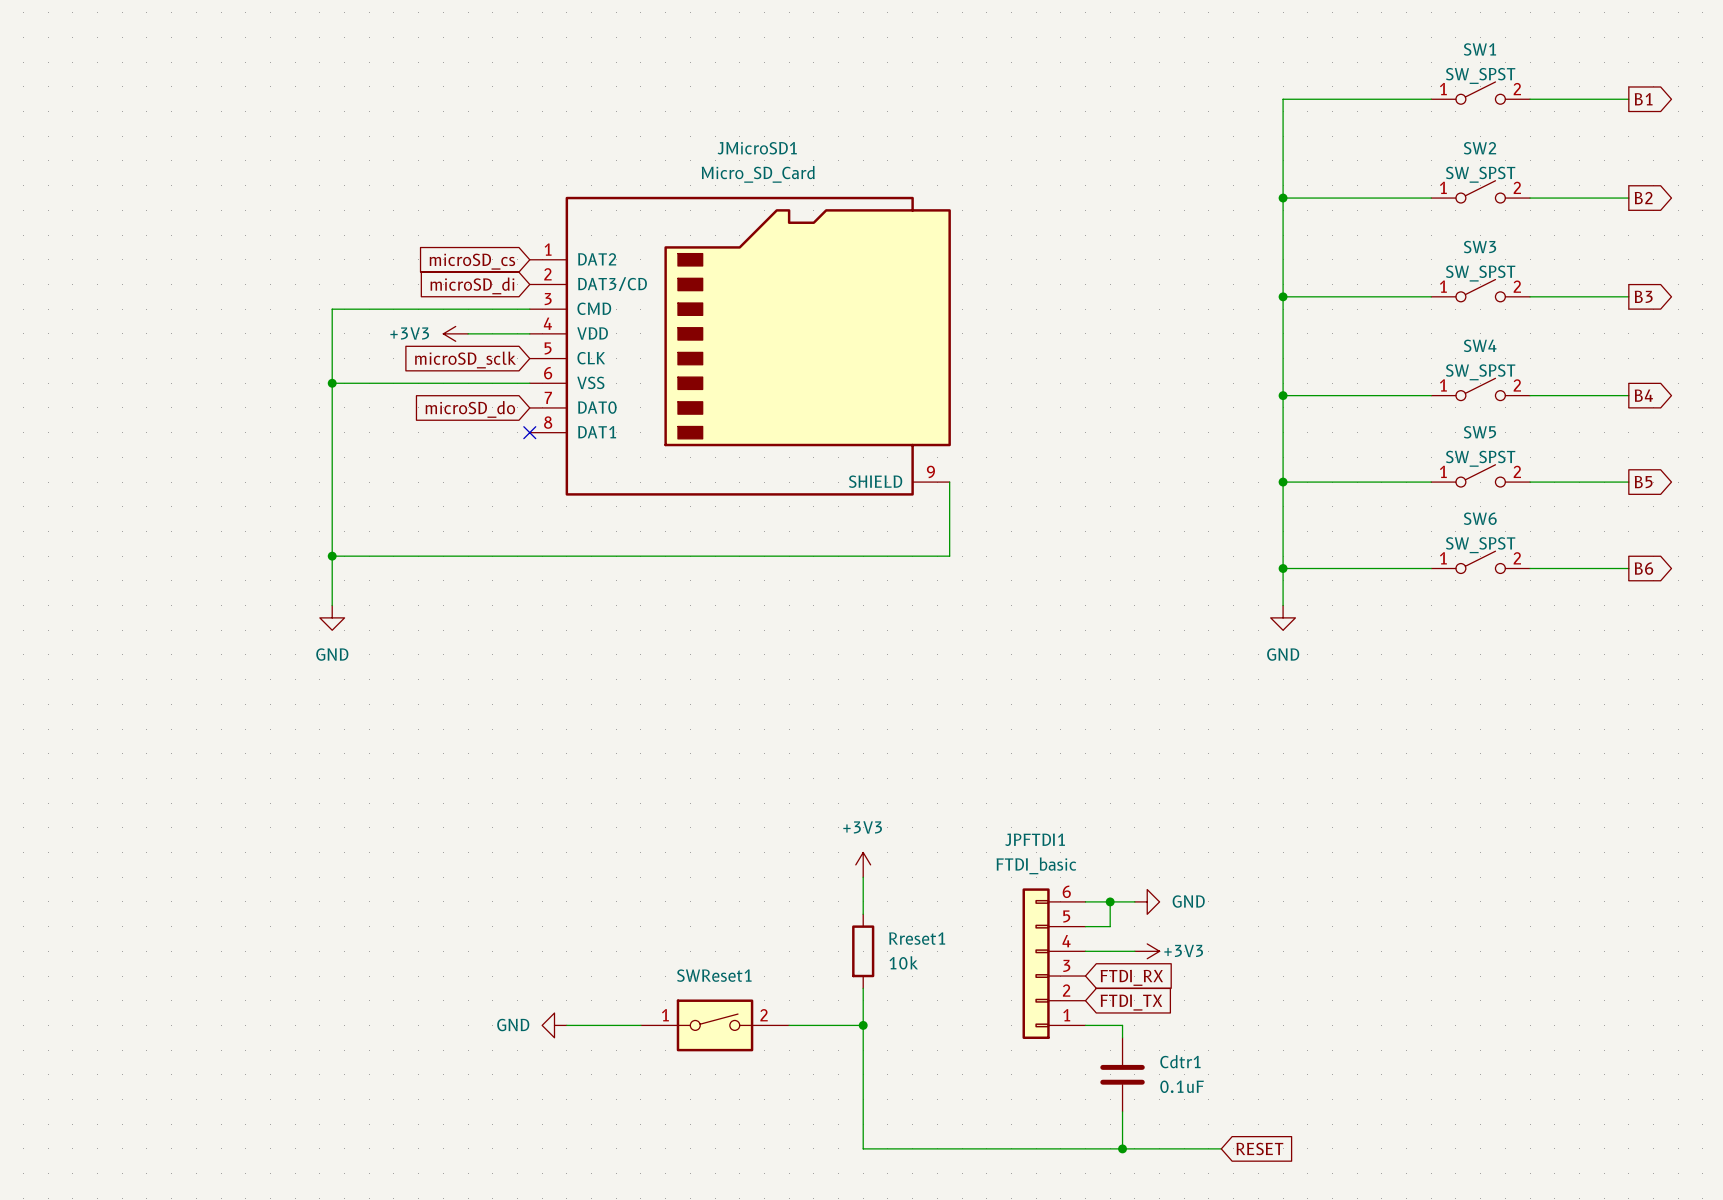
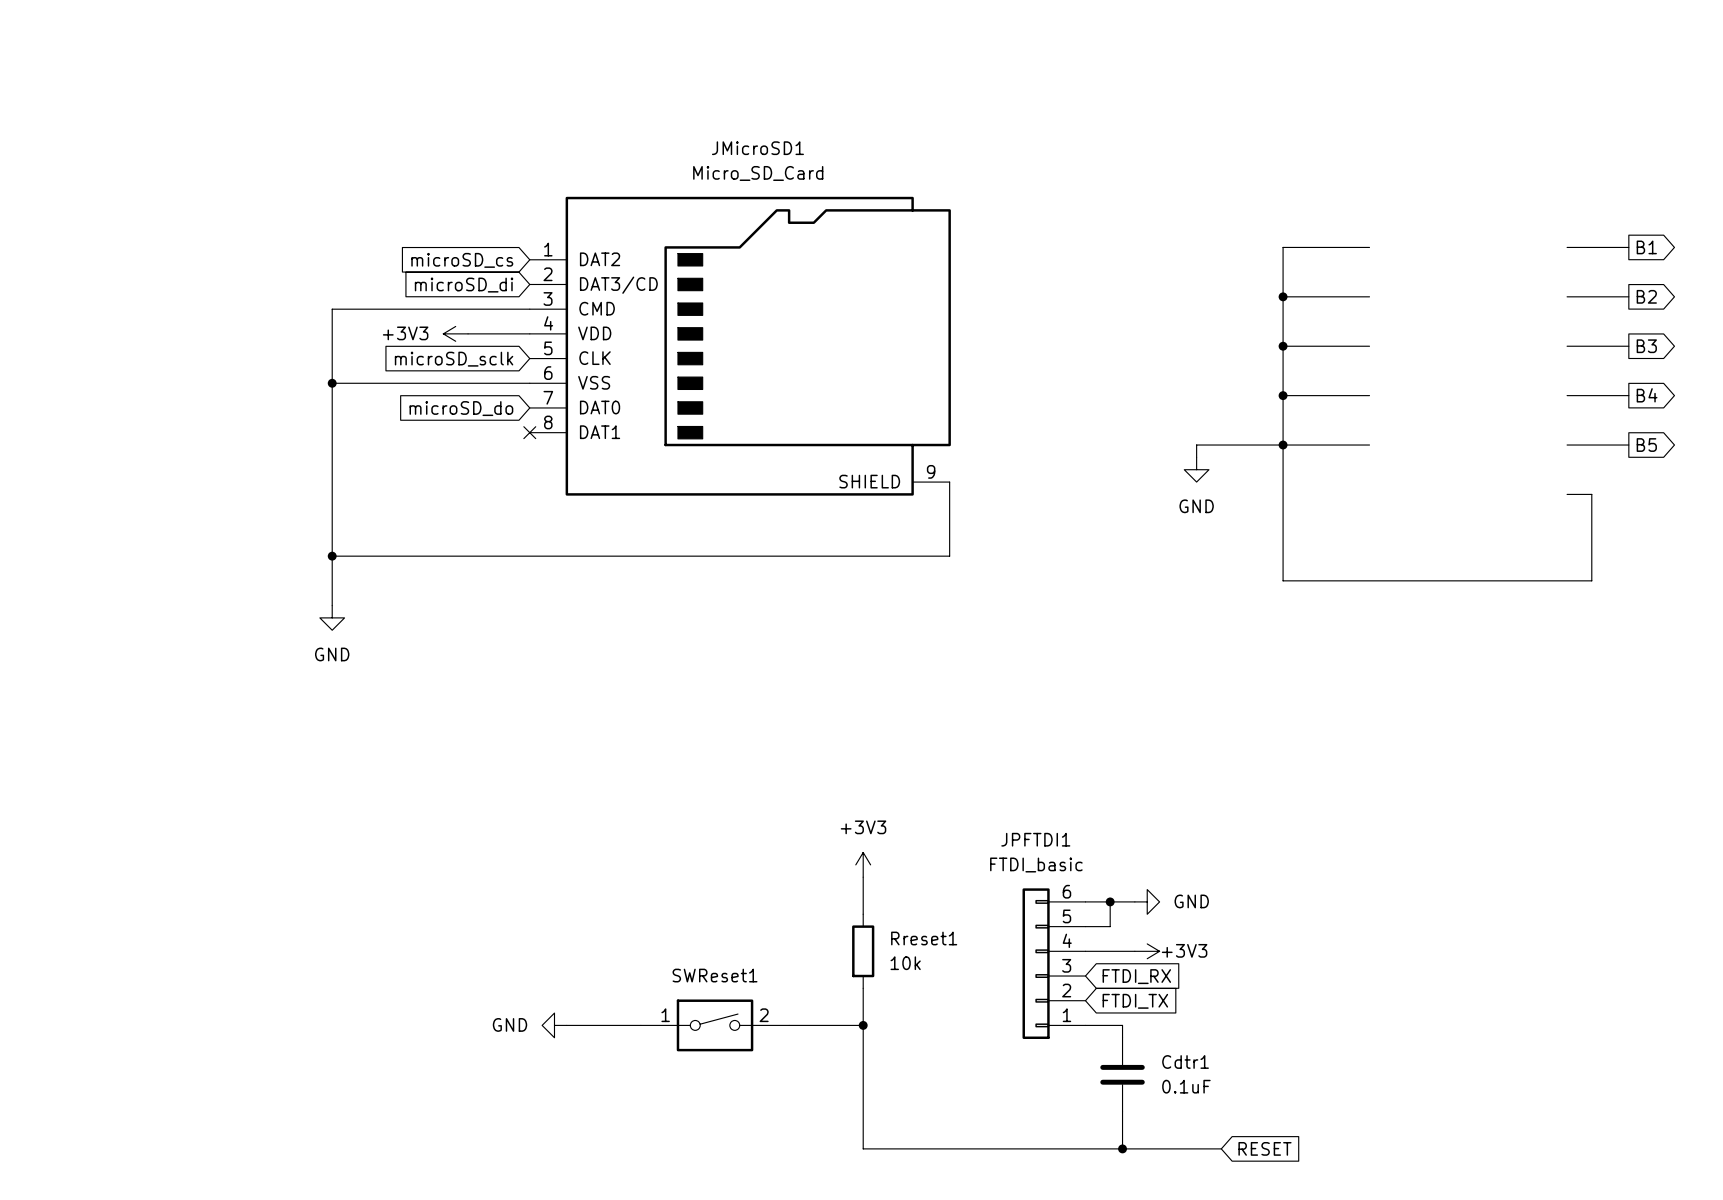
SW1: SW_SPST (1480, 93) -> none
wire: (1431, 99) (1283, 99) (1283, 247) -> (1369, 247) (1283, 247)
wire: (1530, 99) (1628, 99) -> none
global label position: B1 (1643, 99) -> B1 (1646, 247)
SW2: SW_SPST (1480, 191) -> none
wire: (1283, 198) (1431, 198) -> none
junction: (1283, 198) -> none
wire: (1530, 198) (1628, 198) -> none
global label: B2 (1643, 198) -> none
wire: none -> (1567, 247) (1628, 247)
SW3: SW_SPST (1480, 290) -> none
wire: (1369, 296) (1431, 296) -> (1567, 346) (1628, 346)
wire: (1530, 296) (1567, 296) -> none
global label: B3 (1643, 296) -> B2 (1646, 296)
wire: none -> (1283, 346) (1369, 346)
junction: none -> (1283, 346)
global label: none -> B3 (1646, 346)
SW4: SW_SPST (1480, 389) -> none
wire: (1369, 395) (1431, 395) -> (1567, 445) (1628, 445)
wire: (1530, 395) (1567, 395) -> none
wire: none -> (1369, 445) (1196, 445) (1196, 457)
SW5: SW_SPST (1480, 475) -> none
wire: (1283, 482) (1431, 482) -> none
junction position: (1283, 482) -> (1283, 445)
wire: (1530, 482) (1628, 482) -> none
global label position: B5 (1643, 482) -> B5 (1646, 445)
SW6: SW_SPST (1480, 562) -> none
wire: (1283, 568) (1431, 568) -> none
junction: (1283, 568) -> none
wire: (1530, 568) (1628, 568) -> none
global label: B6 (1643, 568) -> none
wire: (1283, 580) (1283, 605) -> (1283, 580) (1591, 580) (1591, 494) (1567, 494)
power symbol position: GND (1283, 617) -> GND (1196, 469)

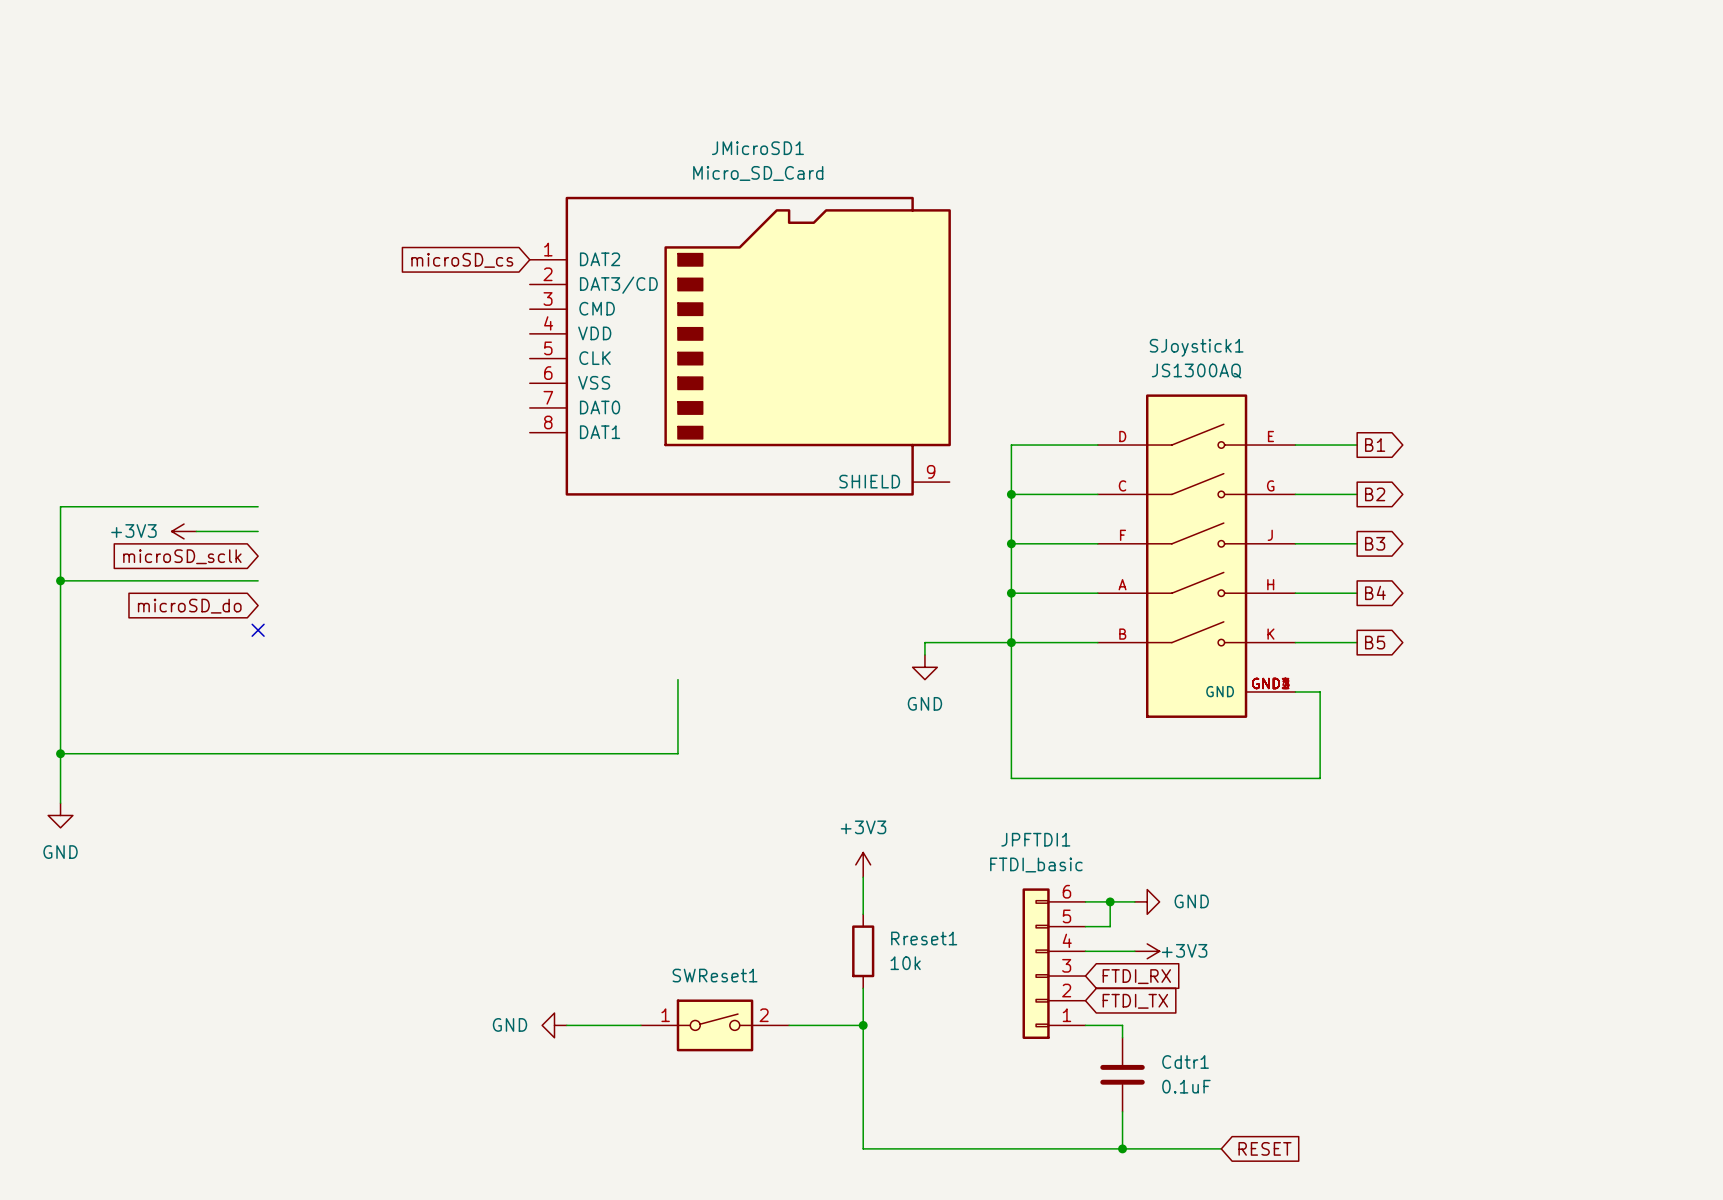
wire: (1369, 247) (1283, 247) (1283, 580) (1591, 580) (1591, 494) (1567, 494) -> none
wire: (1567, 247) (1628, 247) -> none
global label: B1 (1646, 247) -> none
global label: microSD_di (464, 285) -> none
wire: (1283, 296) (1369, 296) -> none
junction: (1283, 296) -> none
wire: (1567, 296) (1628, 296) -> none
global label: B2 (1646, 296) -> none
wire: (529, 309) (332, 309) (332, 605) -> none
power symbol: +3V3 (455, 333) -> none
wire: (468, 333) (529, 333) -> none
wire: (1283, 346) (1369, 346) -> none
junction: (1283, 346) -> none
wire: (1567, 346) (1628, 346) -> none
global label: B3 (1646, 346) -> none
global label: microSD_sclk (454, 359) -> none
wire: (332, 383) (529, 383) -> none
junction: (332, 383) -> none
wire: (1283, 395) (1369, 395) -> none
junction: (1283, 395) -> none
wire: (1567, 395) (1628, 395) -> none
global label: B4 (1647, 395) -> none
global label: microSD_do (461, 408) -> none
no-connect mark: (529, 432) -> none
wire: none -> (1097, 445) (1011, 445) (1011, 778) (1320, 778) (1320, 691) (1295, 691)
junction: (1283, 445) -> none
wire: (1357, 445) (1369, 445) -> none
global label: none -> B1 (1375, 445)
wire: (1567, 445) (1628, 445) -> none
global label: B5 (1646, 445) -> none
power symbol: GND (1196, 469) -> none
wire: (949, 482) (949, 556) (332, 556) -> none
wire: none -> (1011, 494) (1097, 494)
junction: none -> (1011, 494)
wire: none -> (1295, 494) (1357, 494)
global label: none -> B2 (1375, 494)
wire: none -> (258, 506) (60, 506) (60, 803)
power symbol: none -> +3V3 (184, 531)
wire: none -> (196, 531) (258, 531)
wire: none -> (1011, 543) (1097, 543)
junction: none -> (1011, 543)
wire: none -> (1295, 543) (1357, 543)
global label: none -> B3 (1375, 543)
global label: none -> microSD_sclk (182, 556)
junction: (332, 556) -> none
SJoystick1: none -> JS1300AQ (1196, 556)
wire: none -> (60, 580) (258, 580)
junction: none -> (60, 580)
global label: none -> B4 (1375, 592)
wire: none -> (1011, 593) (1097, 593)
junction: none -> (1011, 593)
wire: none -> (1295, 593) (1357, 593)
global label: none -> microSD_do (189, 606)
power symbol: GND (332, 617) -> none
no-connect mark: none -> (258, 630)
junction: none -> (1011, 642)
wire: none -> (1097, 642) (924, 642) (924, 654)
wire: none -> (1295, 642) (1357, 642)
global label: none -> B5 (1375, 642)
power symbol: none -> GND (924, 667)
wire: none -> (677, 679) (677, 753) (60, 753)
junction: none -> (60, 753)
power symbol: none -> GND (60, 815)

